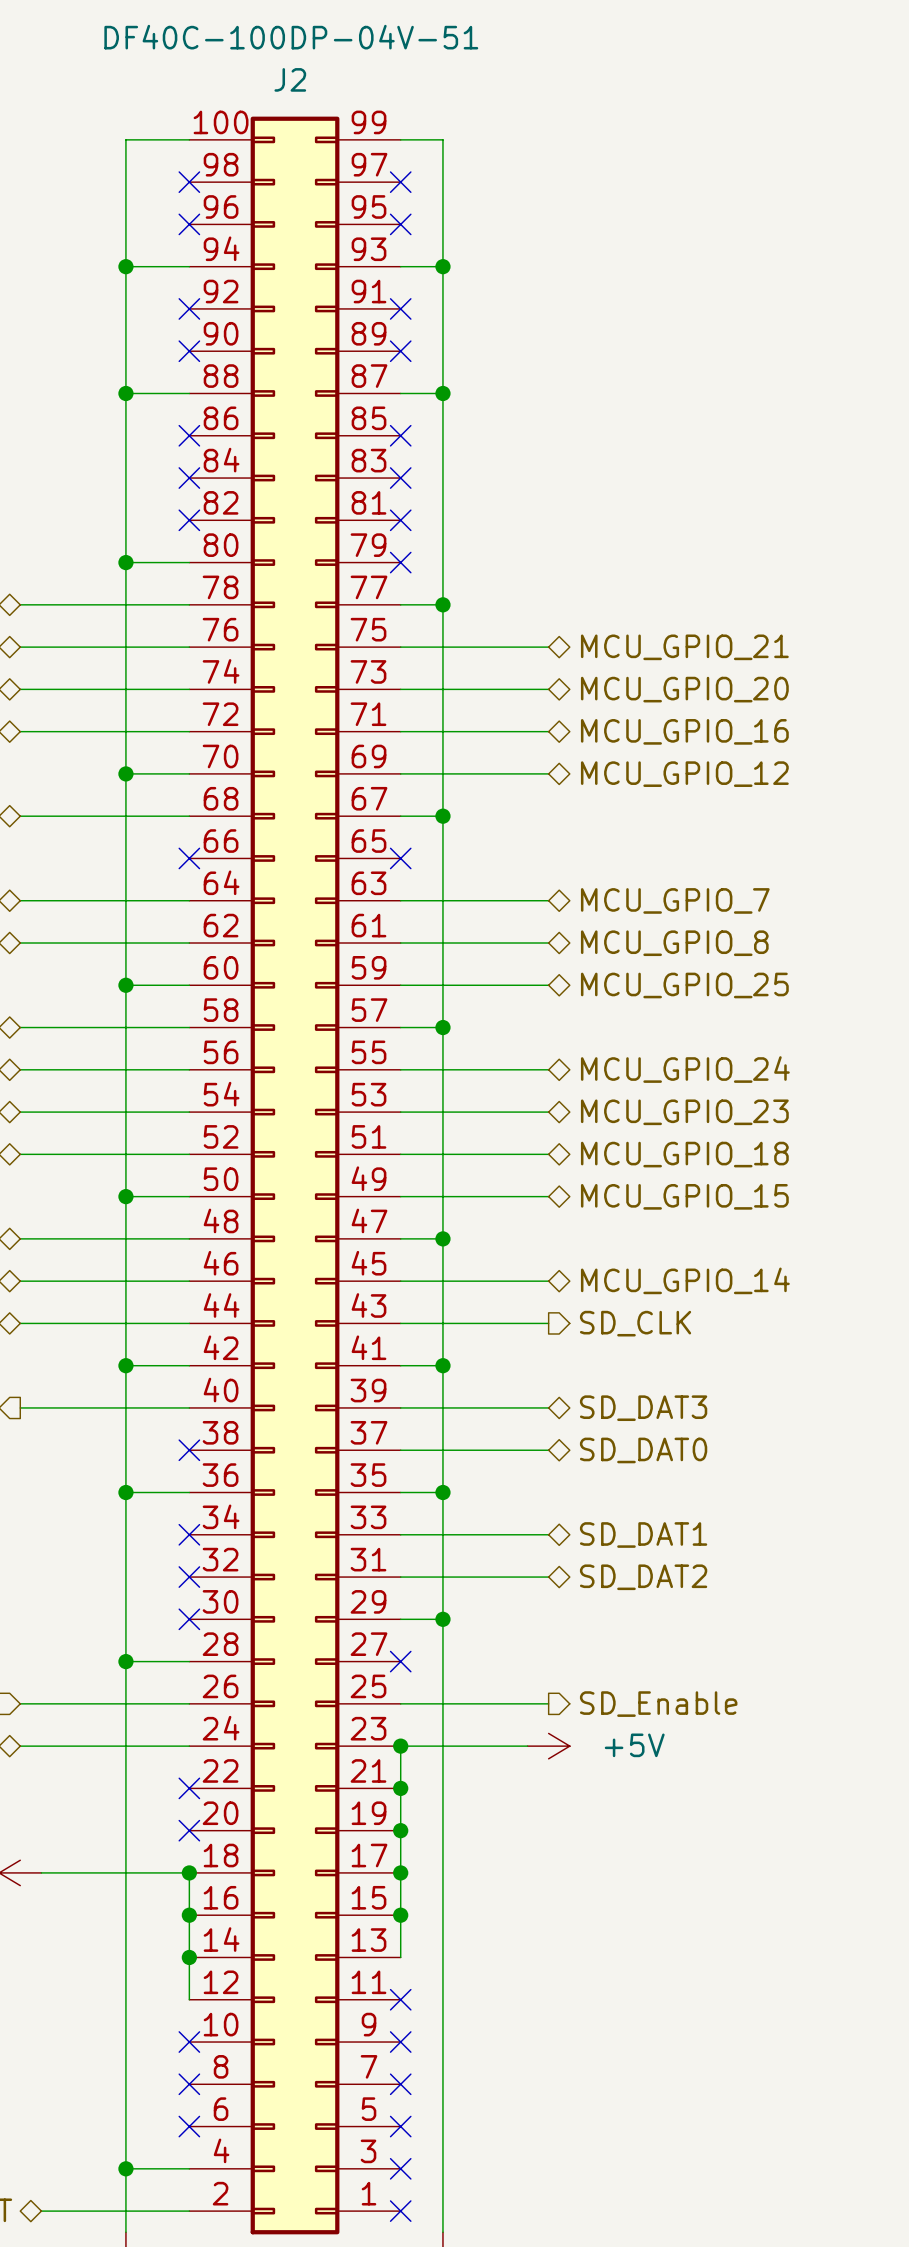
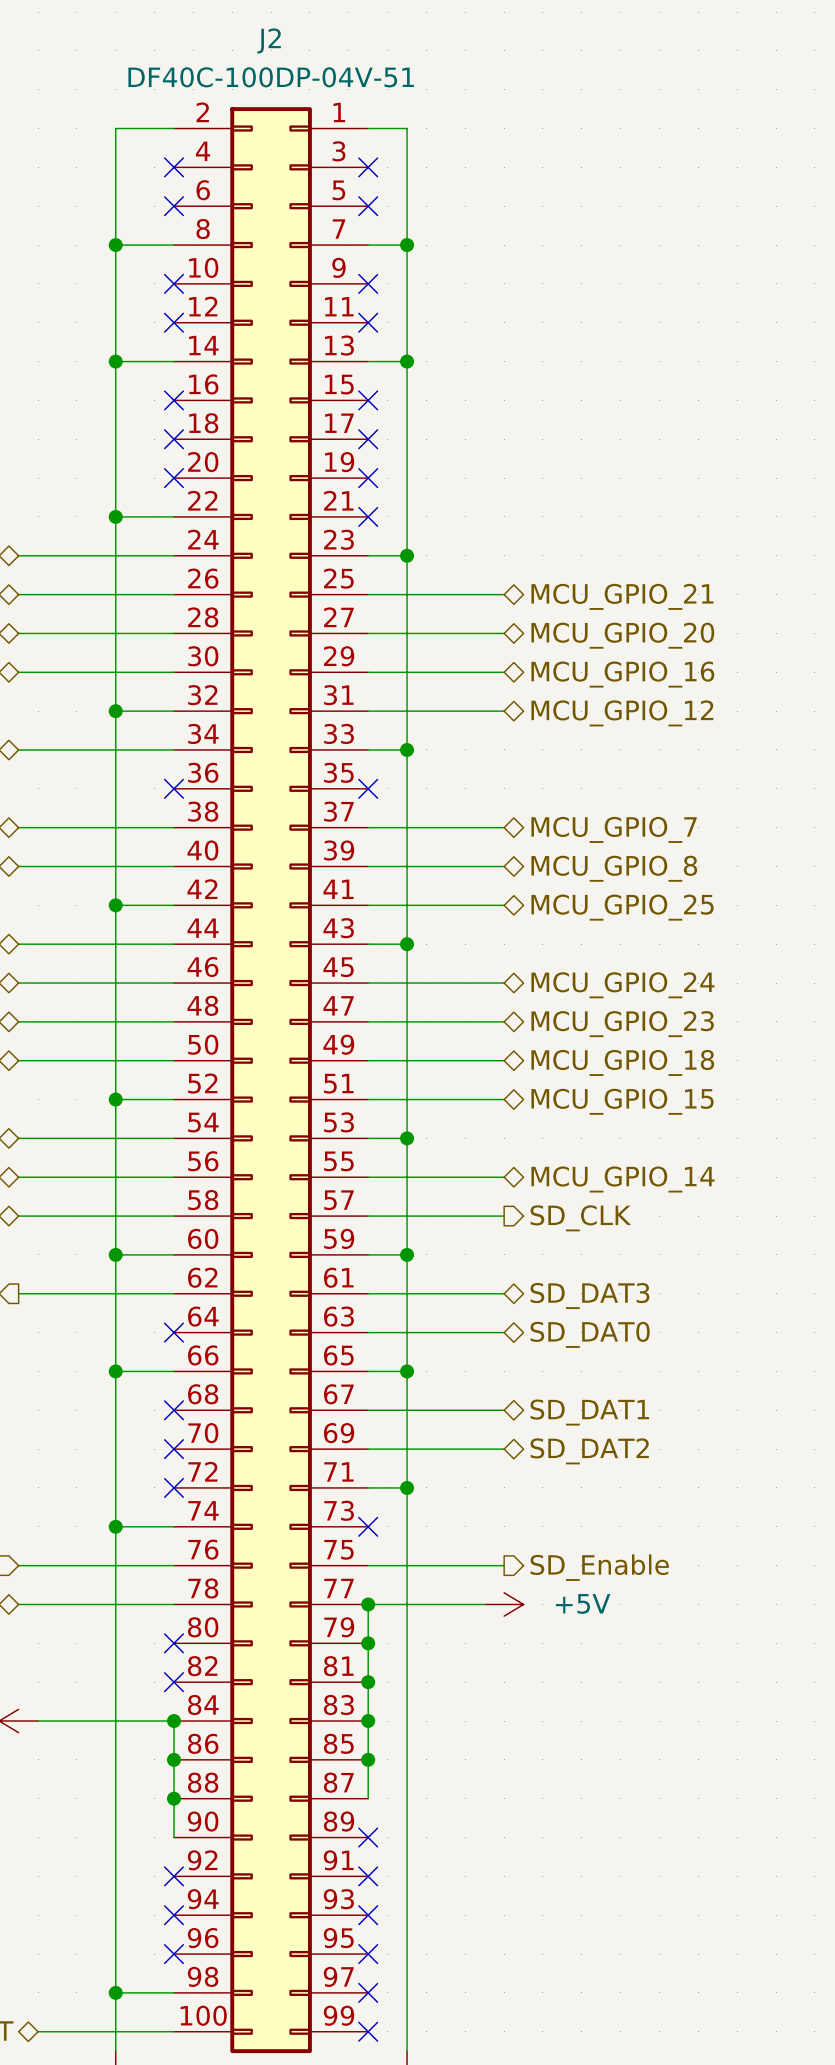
J2 value position: DF40C-100DP-04V-51 (291, 37) -> DF40C-100DP-04V-51 (271, 77)
J2 name position: J2 (290, 79) -> J2 (269, 40)
J2 flip: as is (295, 1175) -> up-down (271, 1080)

